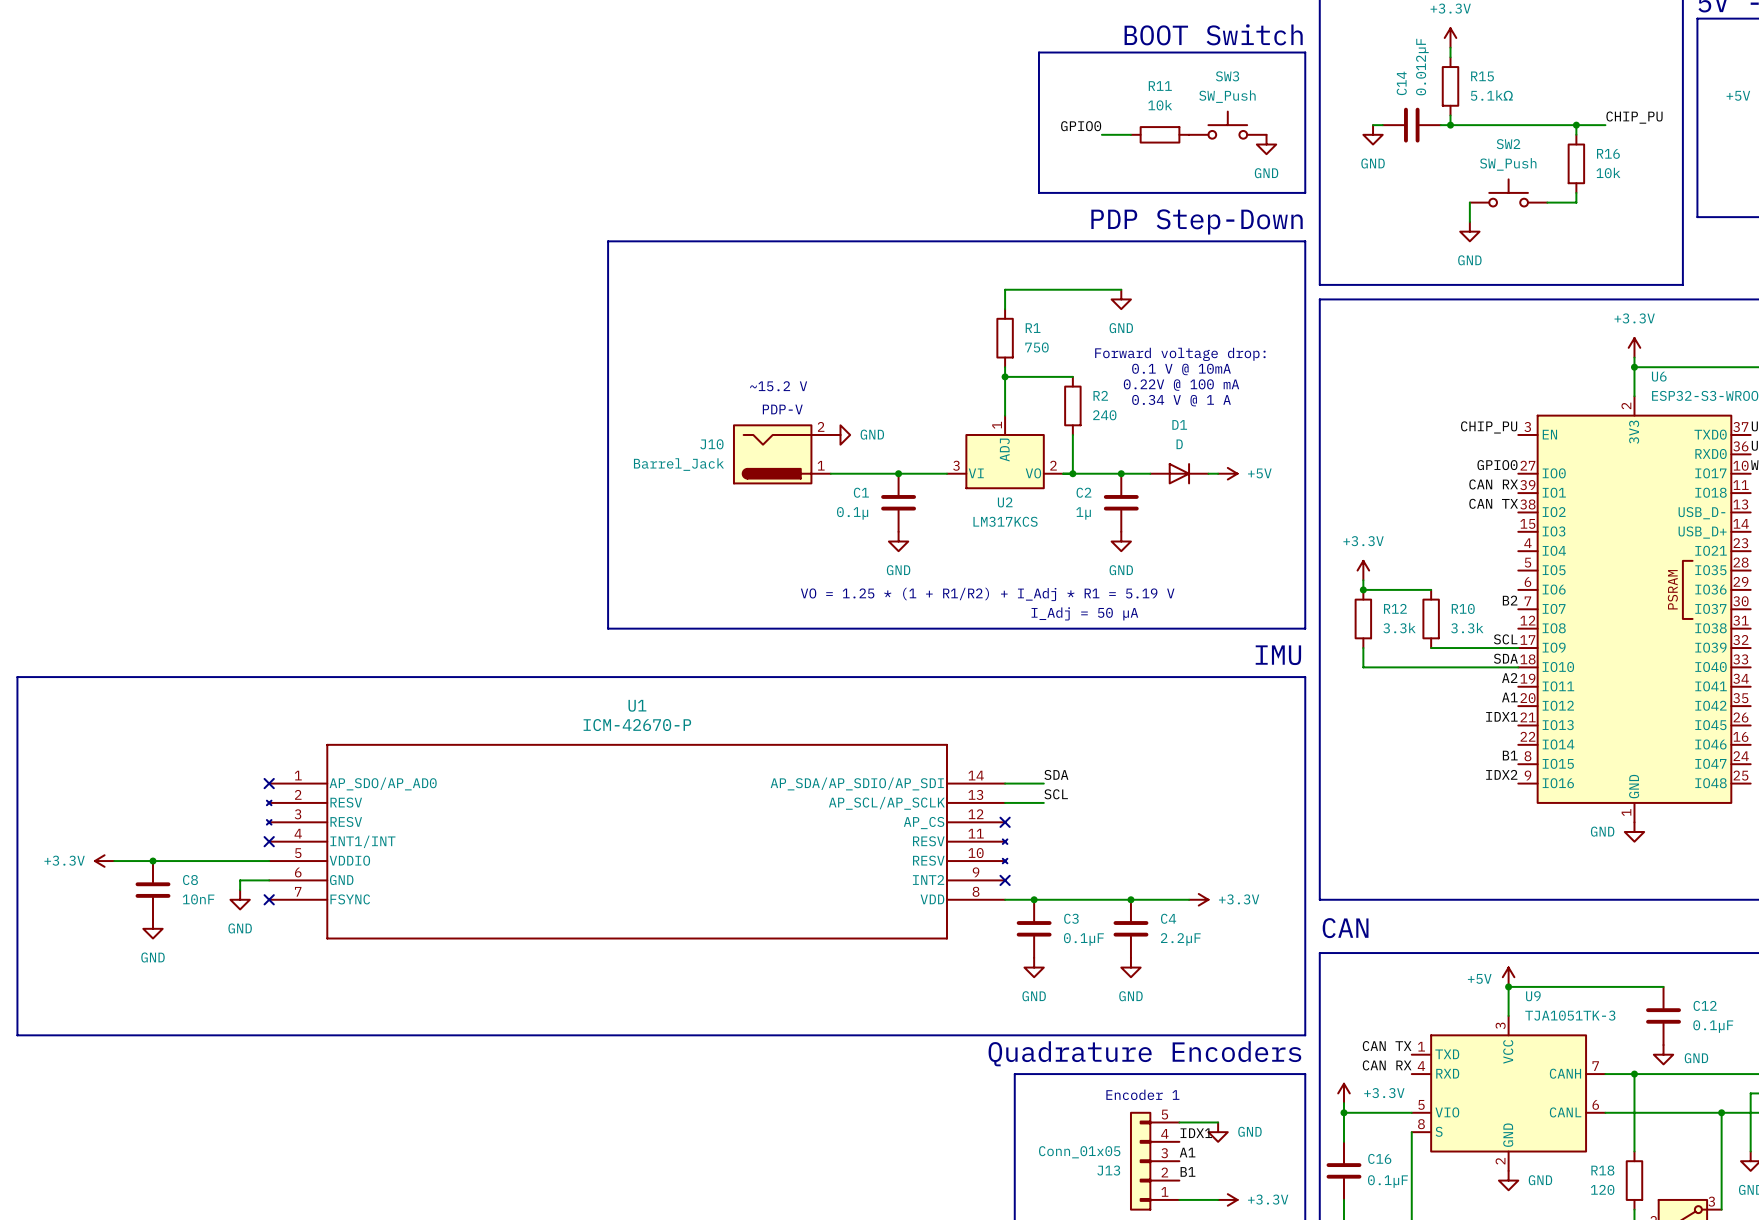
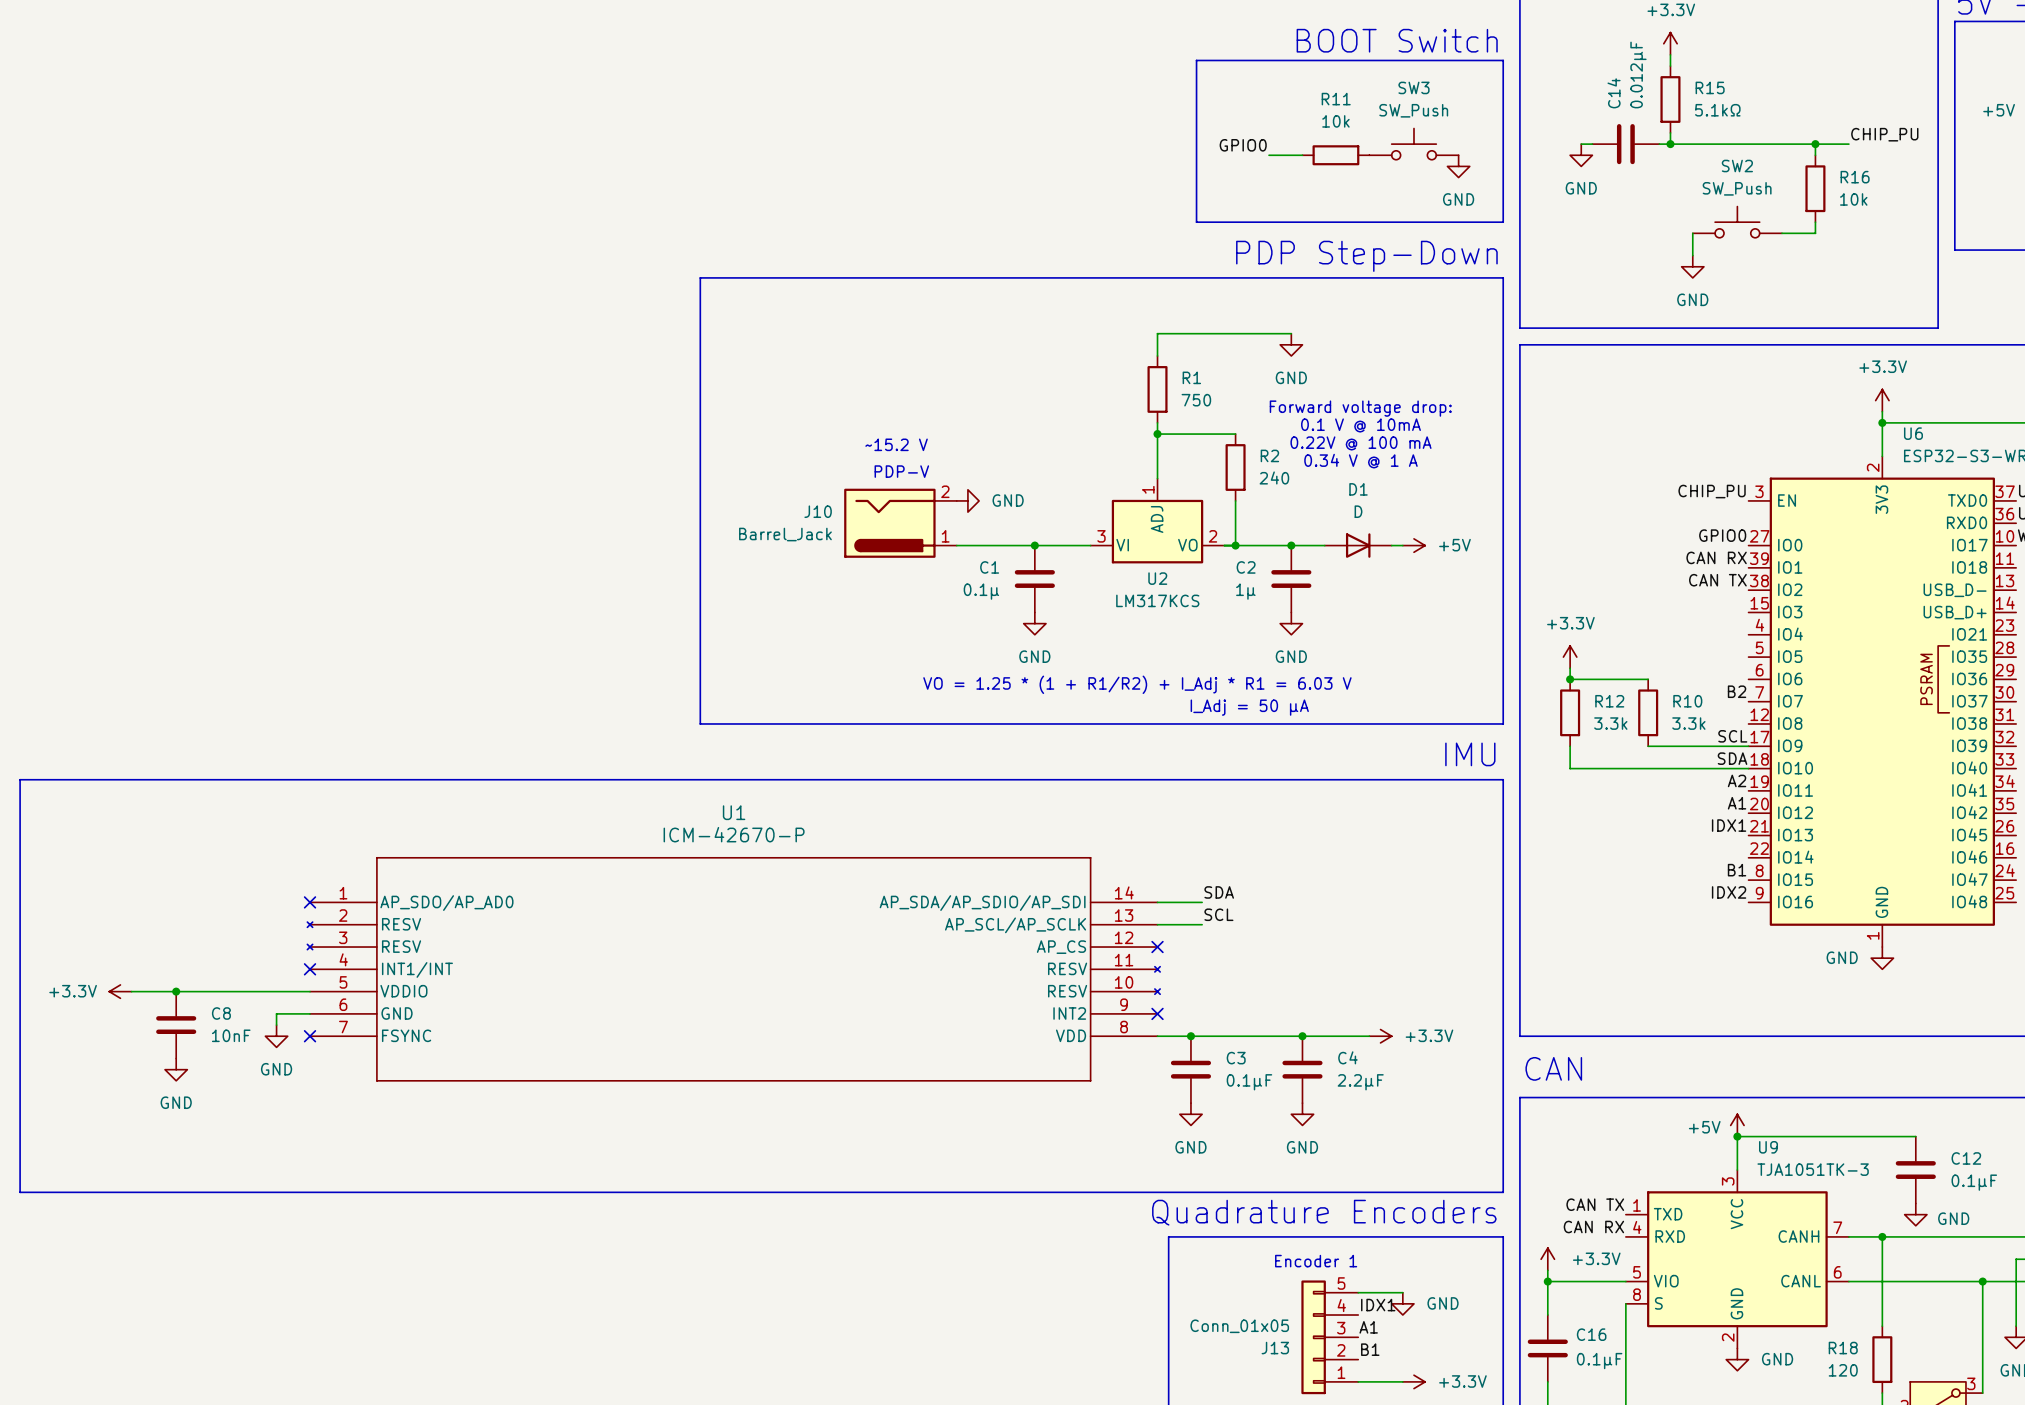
text: VO = 1.25 * (1 + R1/R2) + I_Adj * R1 = 5.19 V (987, 594) -> VO = 1.25 * (1 + R1/R2) + I_Adj * R1 = 6.03 V (1137, 684)

